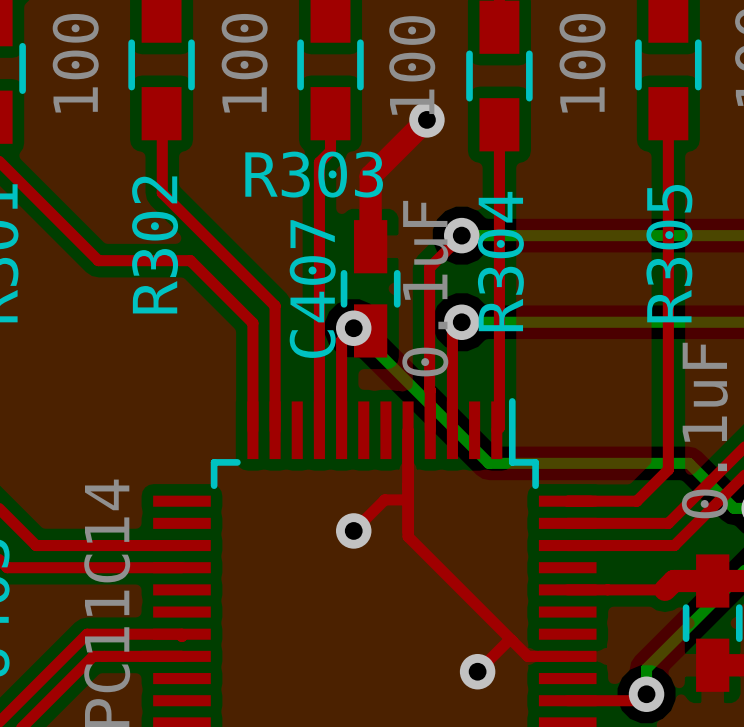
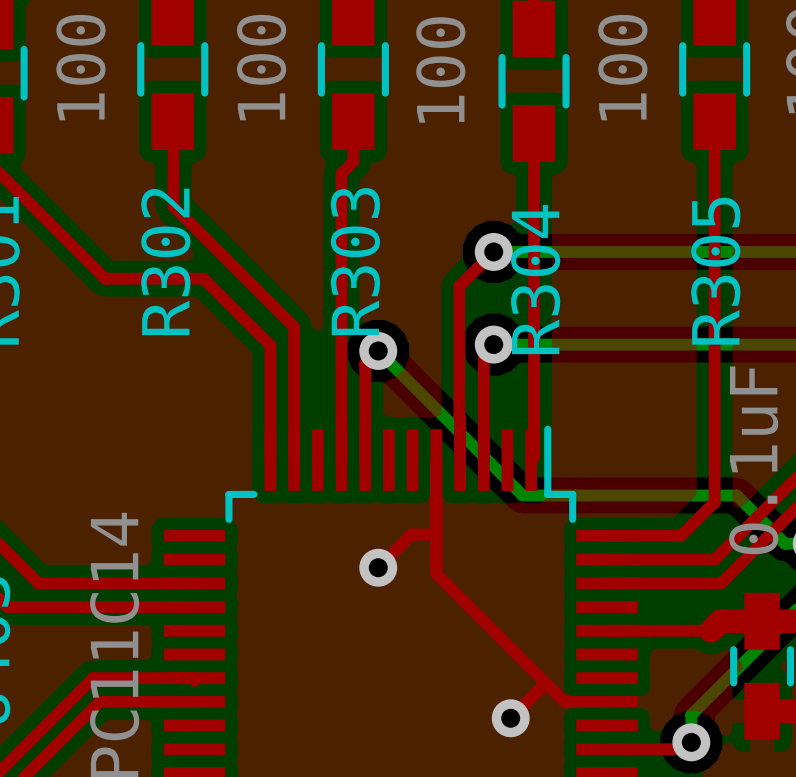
top track: (426, 119) (370, 176) (370, 246) -> none
via: (426, 119) -> none
R303 name rotation: 0° (314, 174) -> 90° counterclockwise (355, 261)
C407: 0.1uF (370, 288) -> none

